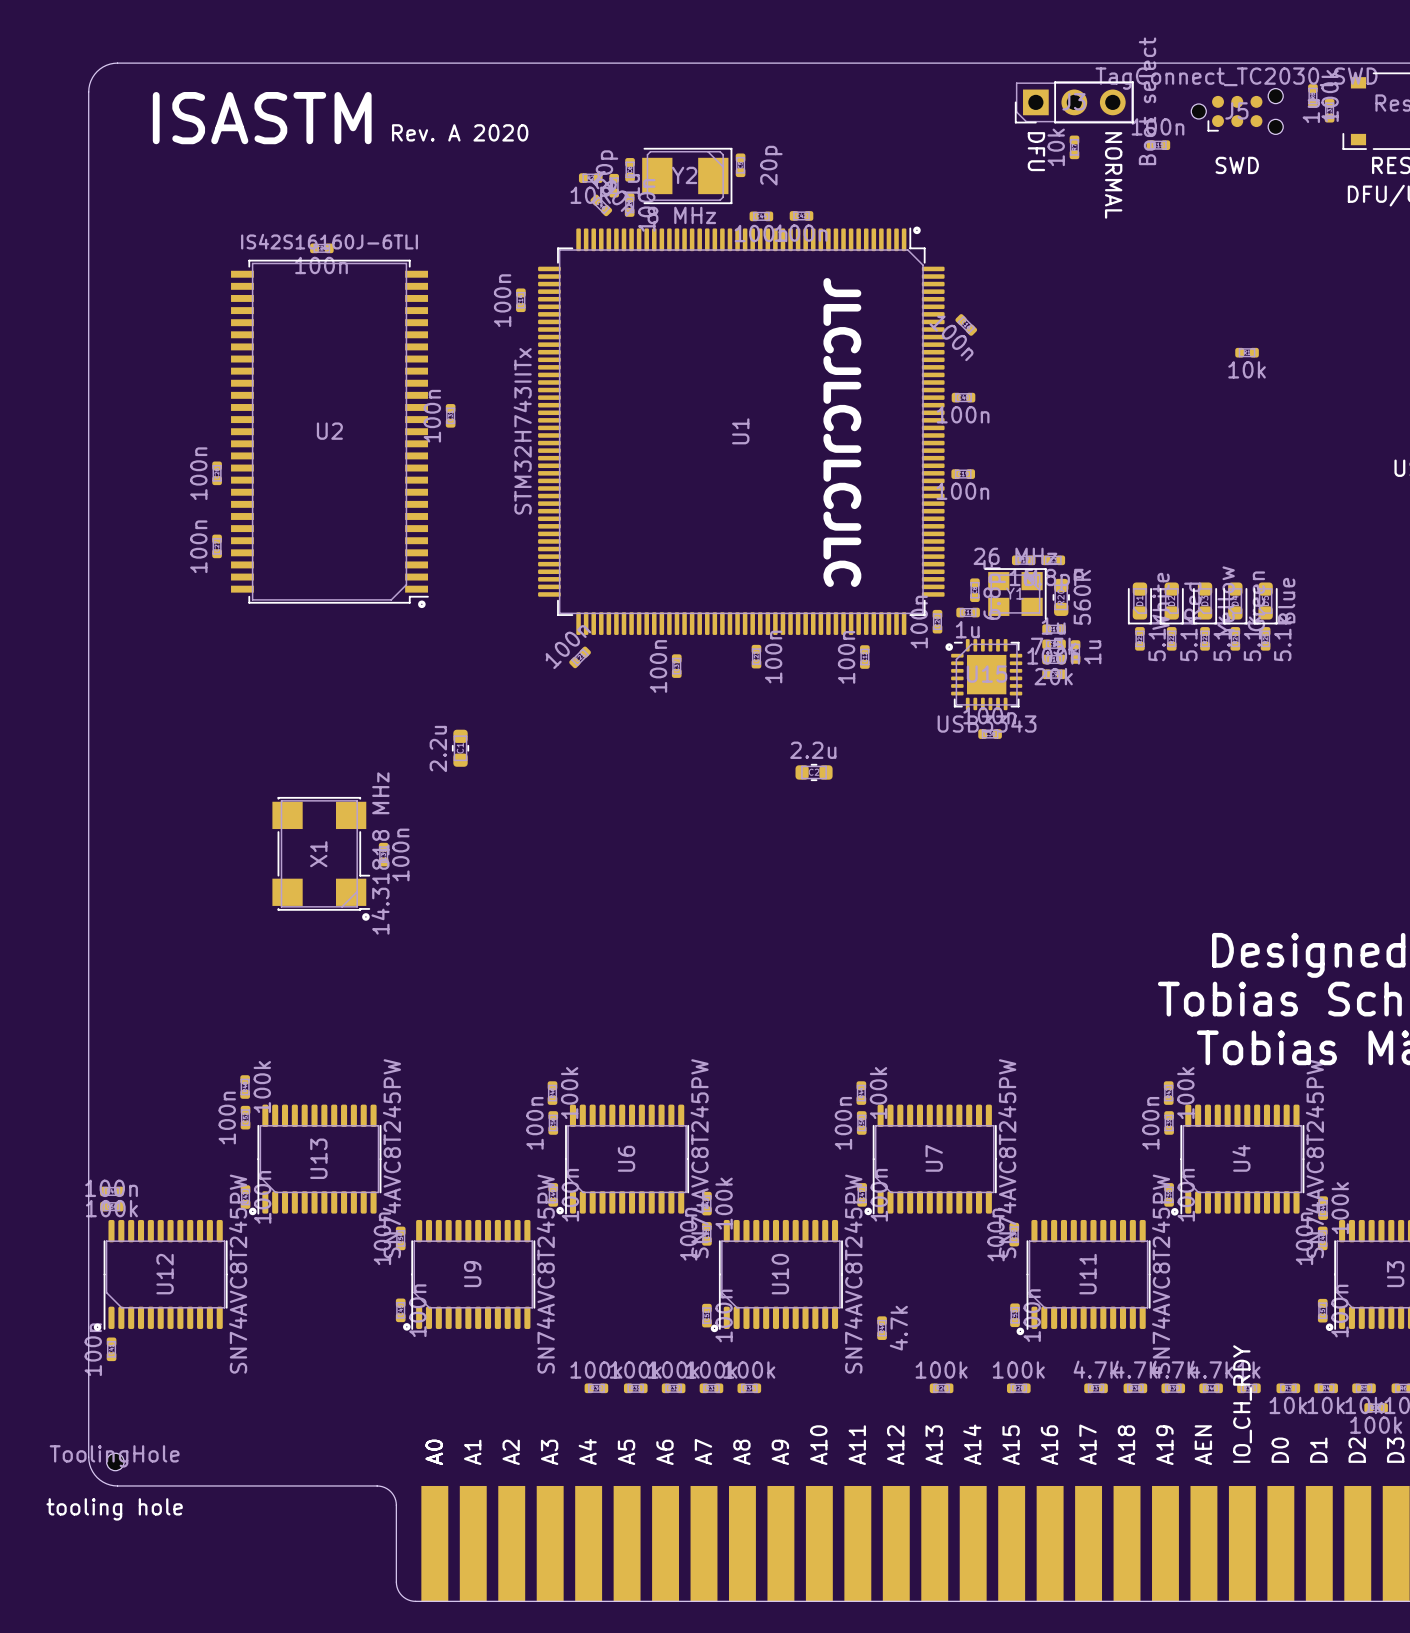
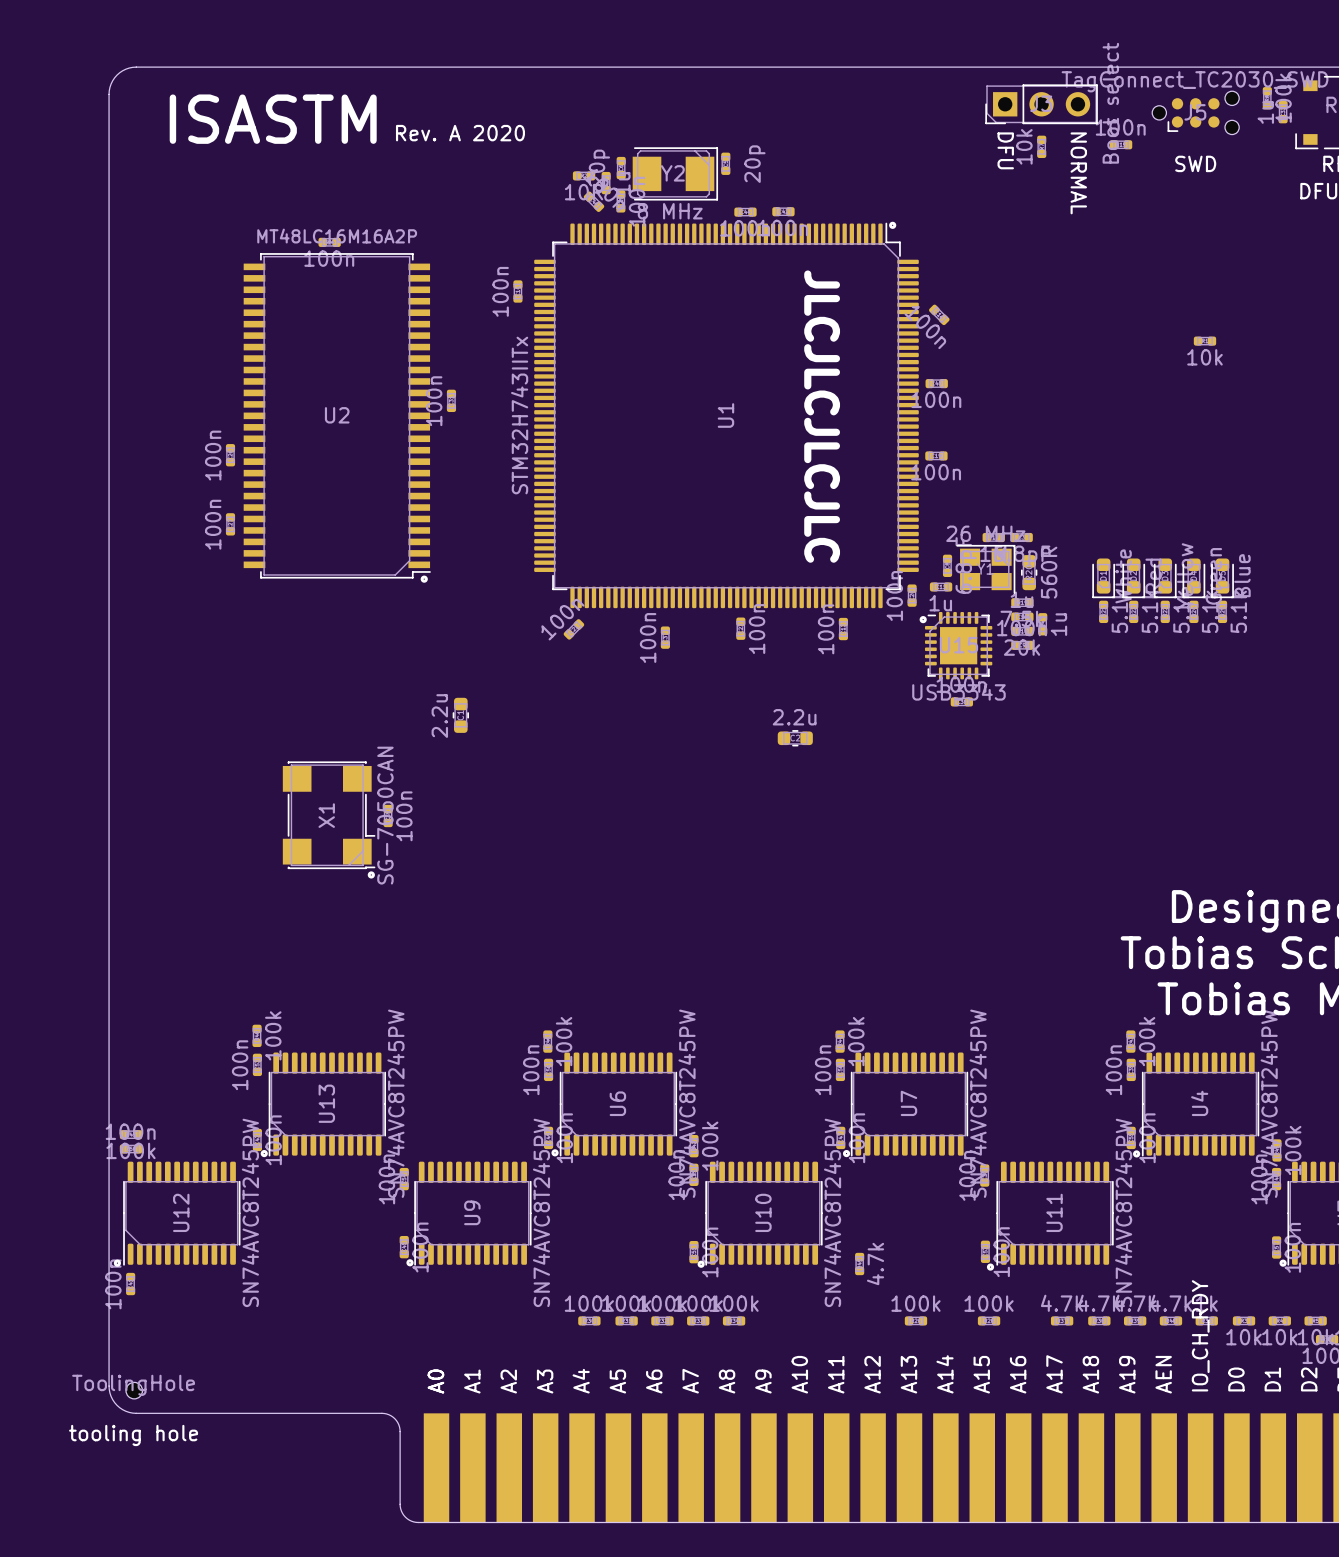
U2 value: IS42S16160J-6TLI (329, 241) -> MT48LC16M16A2P (337, 236)
X1 value: 14.31818 MHz (380, 853) -> SG-7050CAN (385, 815)

